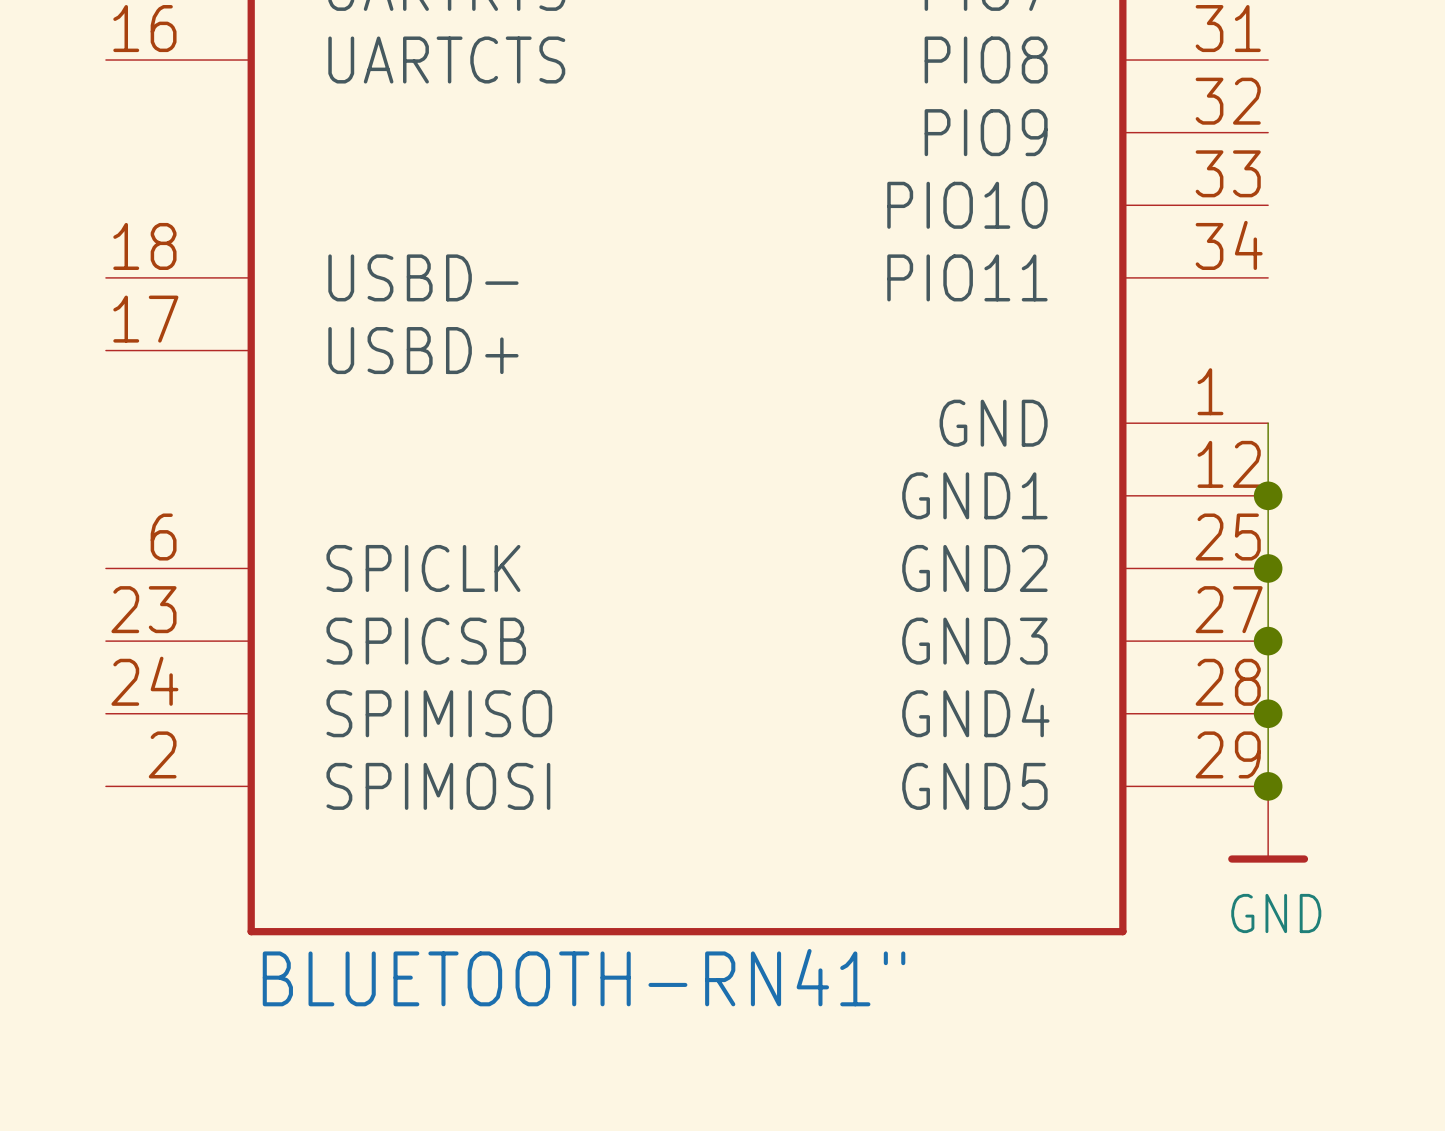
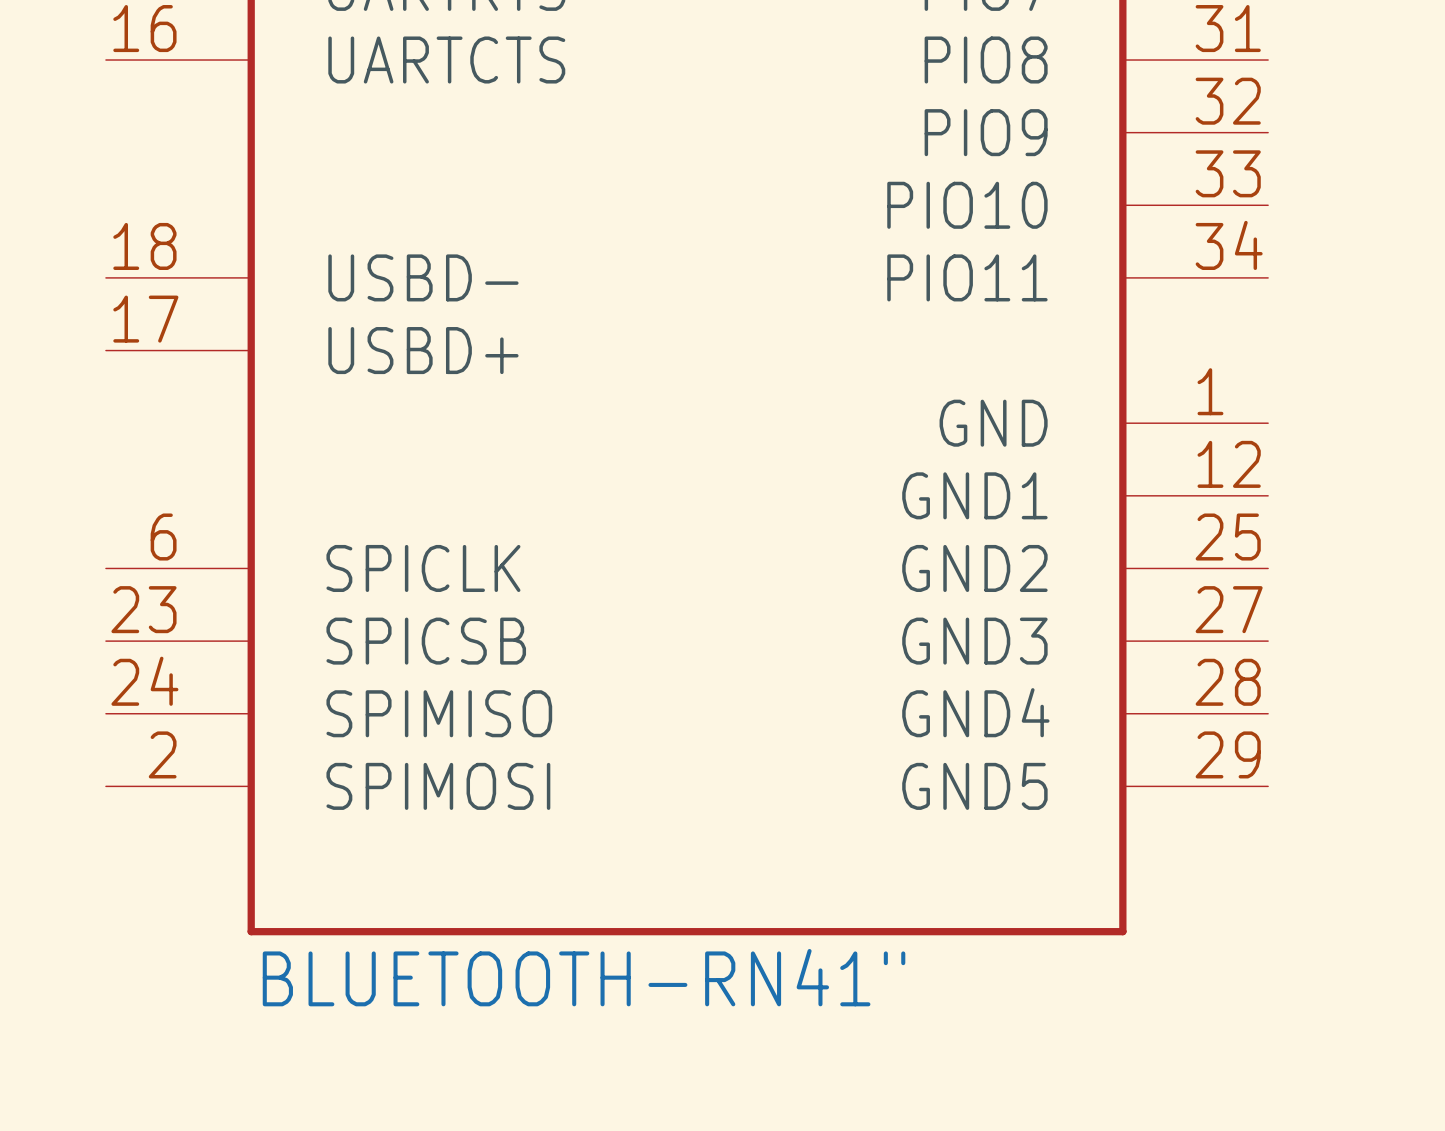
wire: (1268, 423) (1268, 786) -> none
junction: (1268, 495) -> none
junction: (1268, 568) -> none
junction: (1268, 641) -> none
junction: (1268, 713) -> none
junction: (1268, 786) -> none
power symbol: GND (1268, 824) -> none

